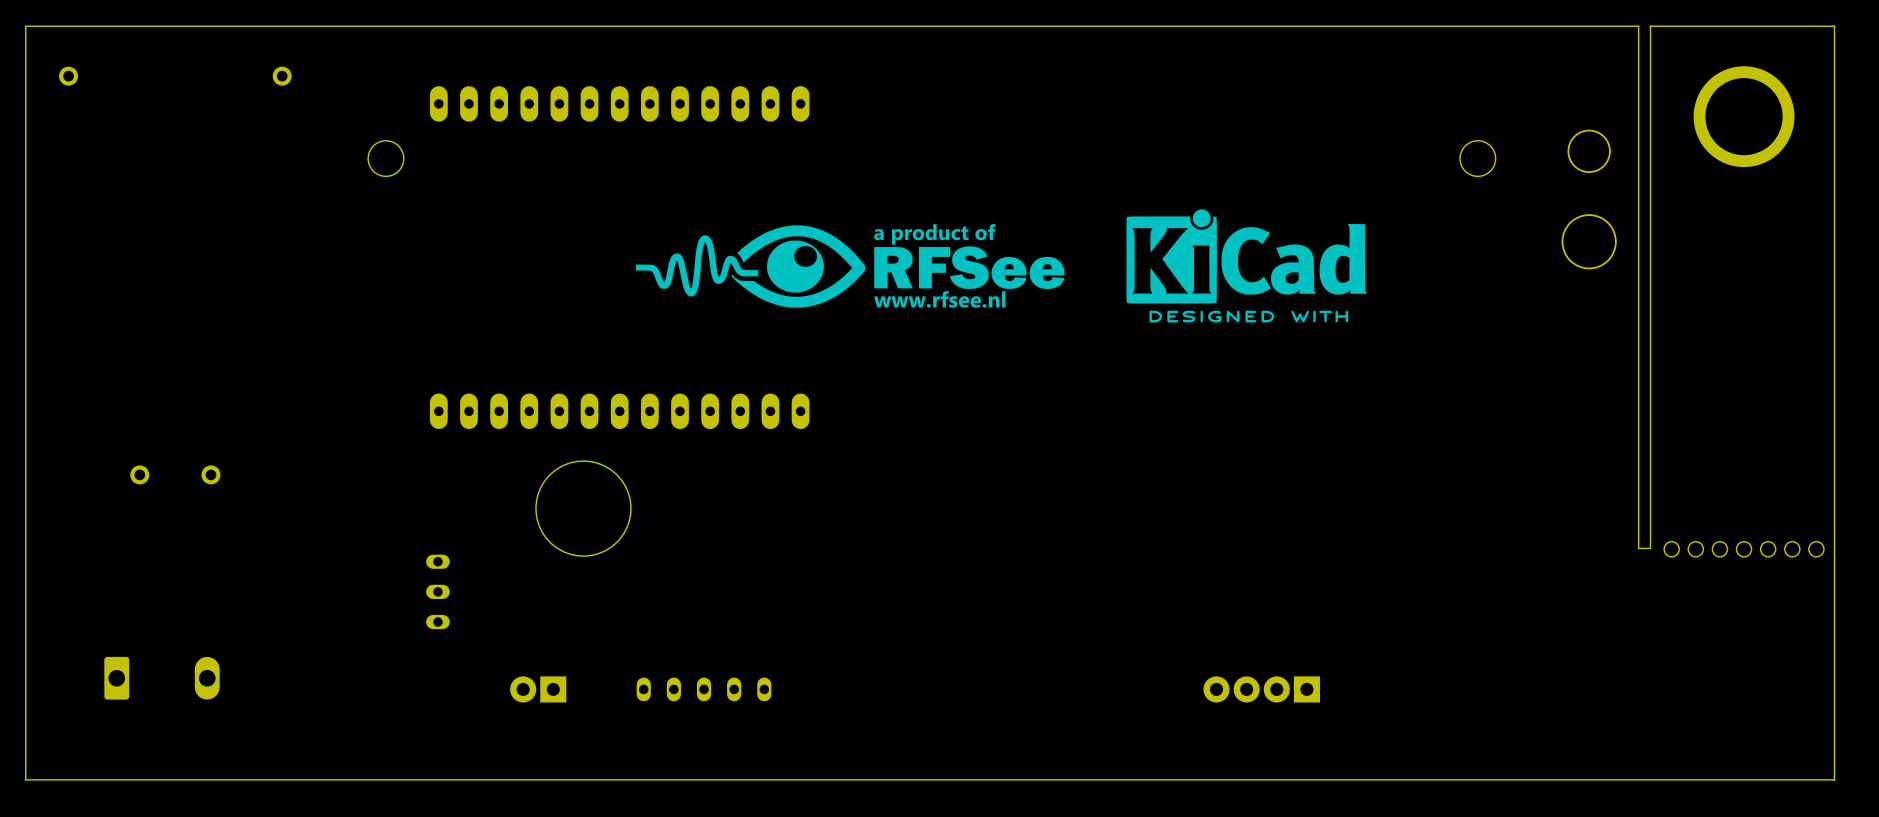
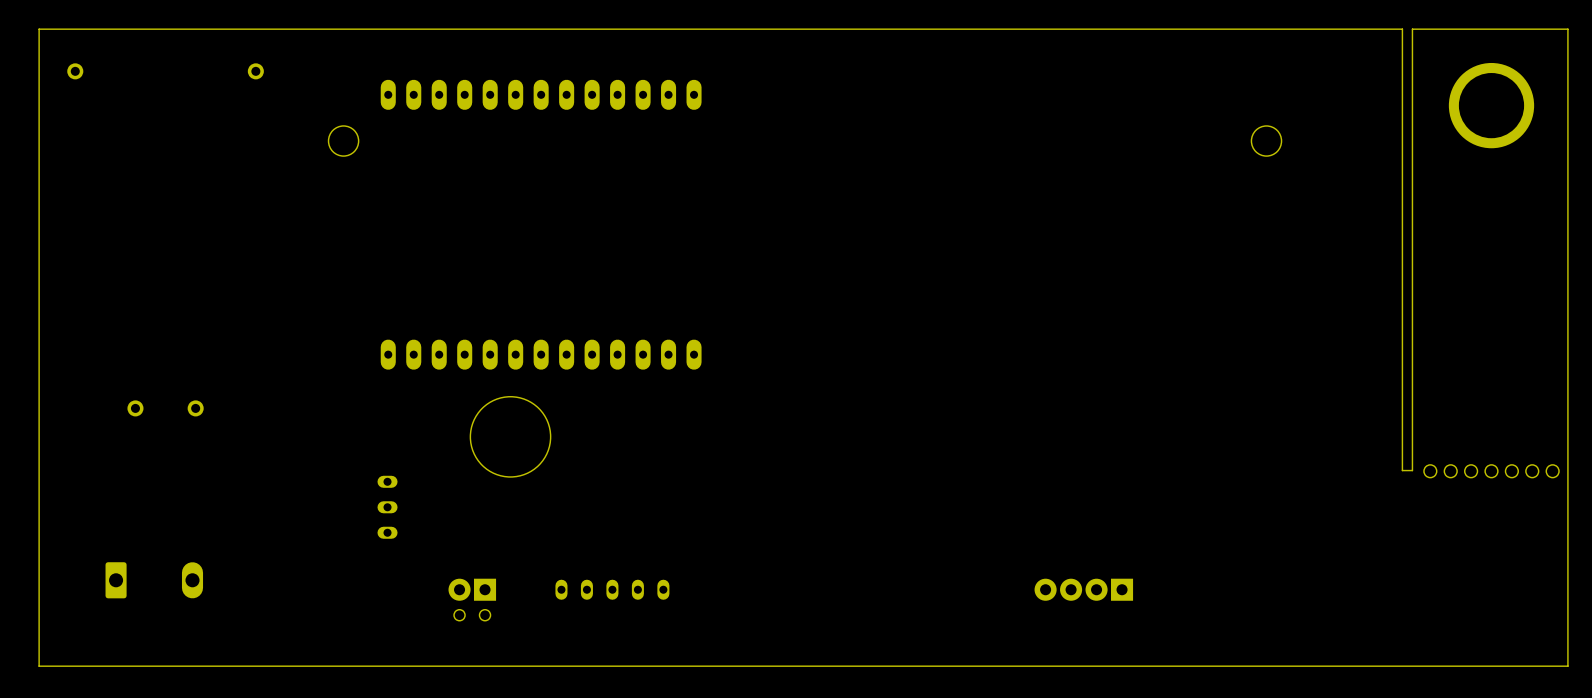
round board edge: [1567, 129, 1611, 173] -> none
drawing: [1126, 209, 1368, 323] -> none
round board edge: [1561, 214, 1617, 270] -> none
drawing: [635, 224, 1065, 308] -> none
part footprint: [510, 676, 567, 703] -> [448, 578, 497, 621]

